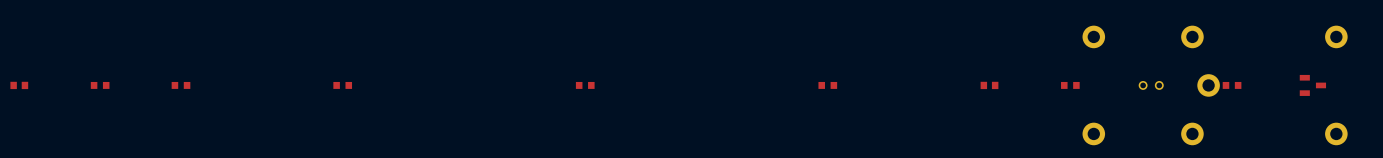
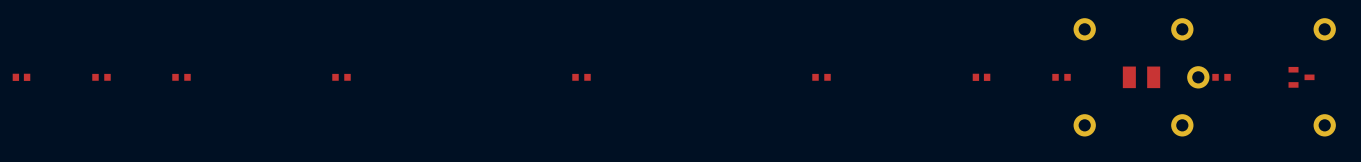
part footprint: [1138, 80, 1164, 90] -> [1122, 66, 1161, 89]

